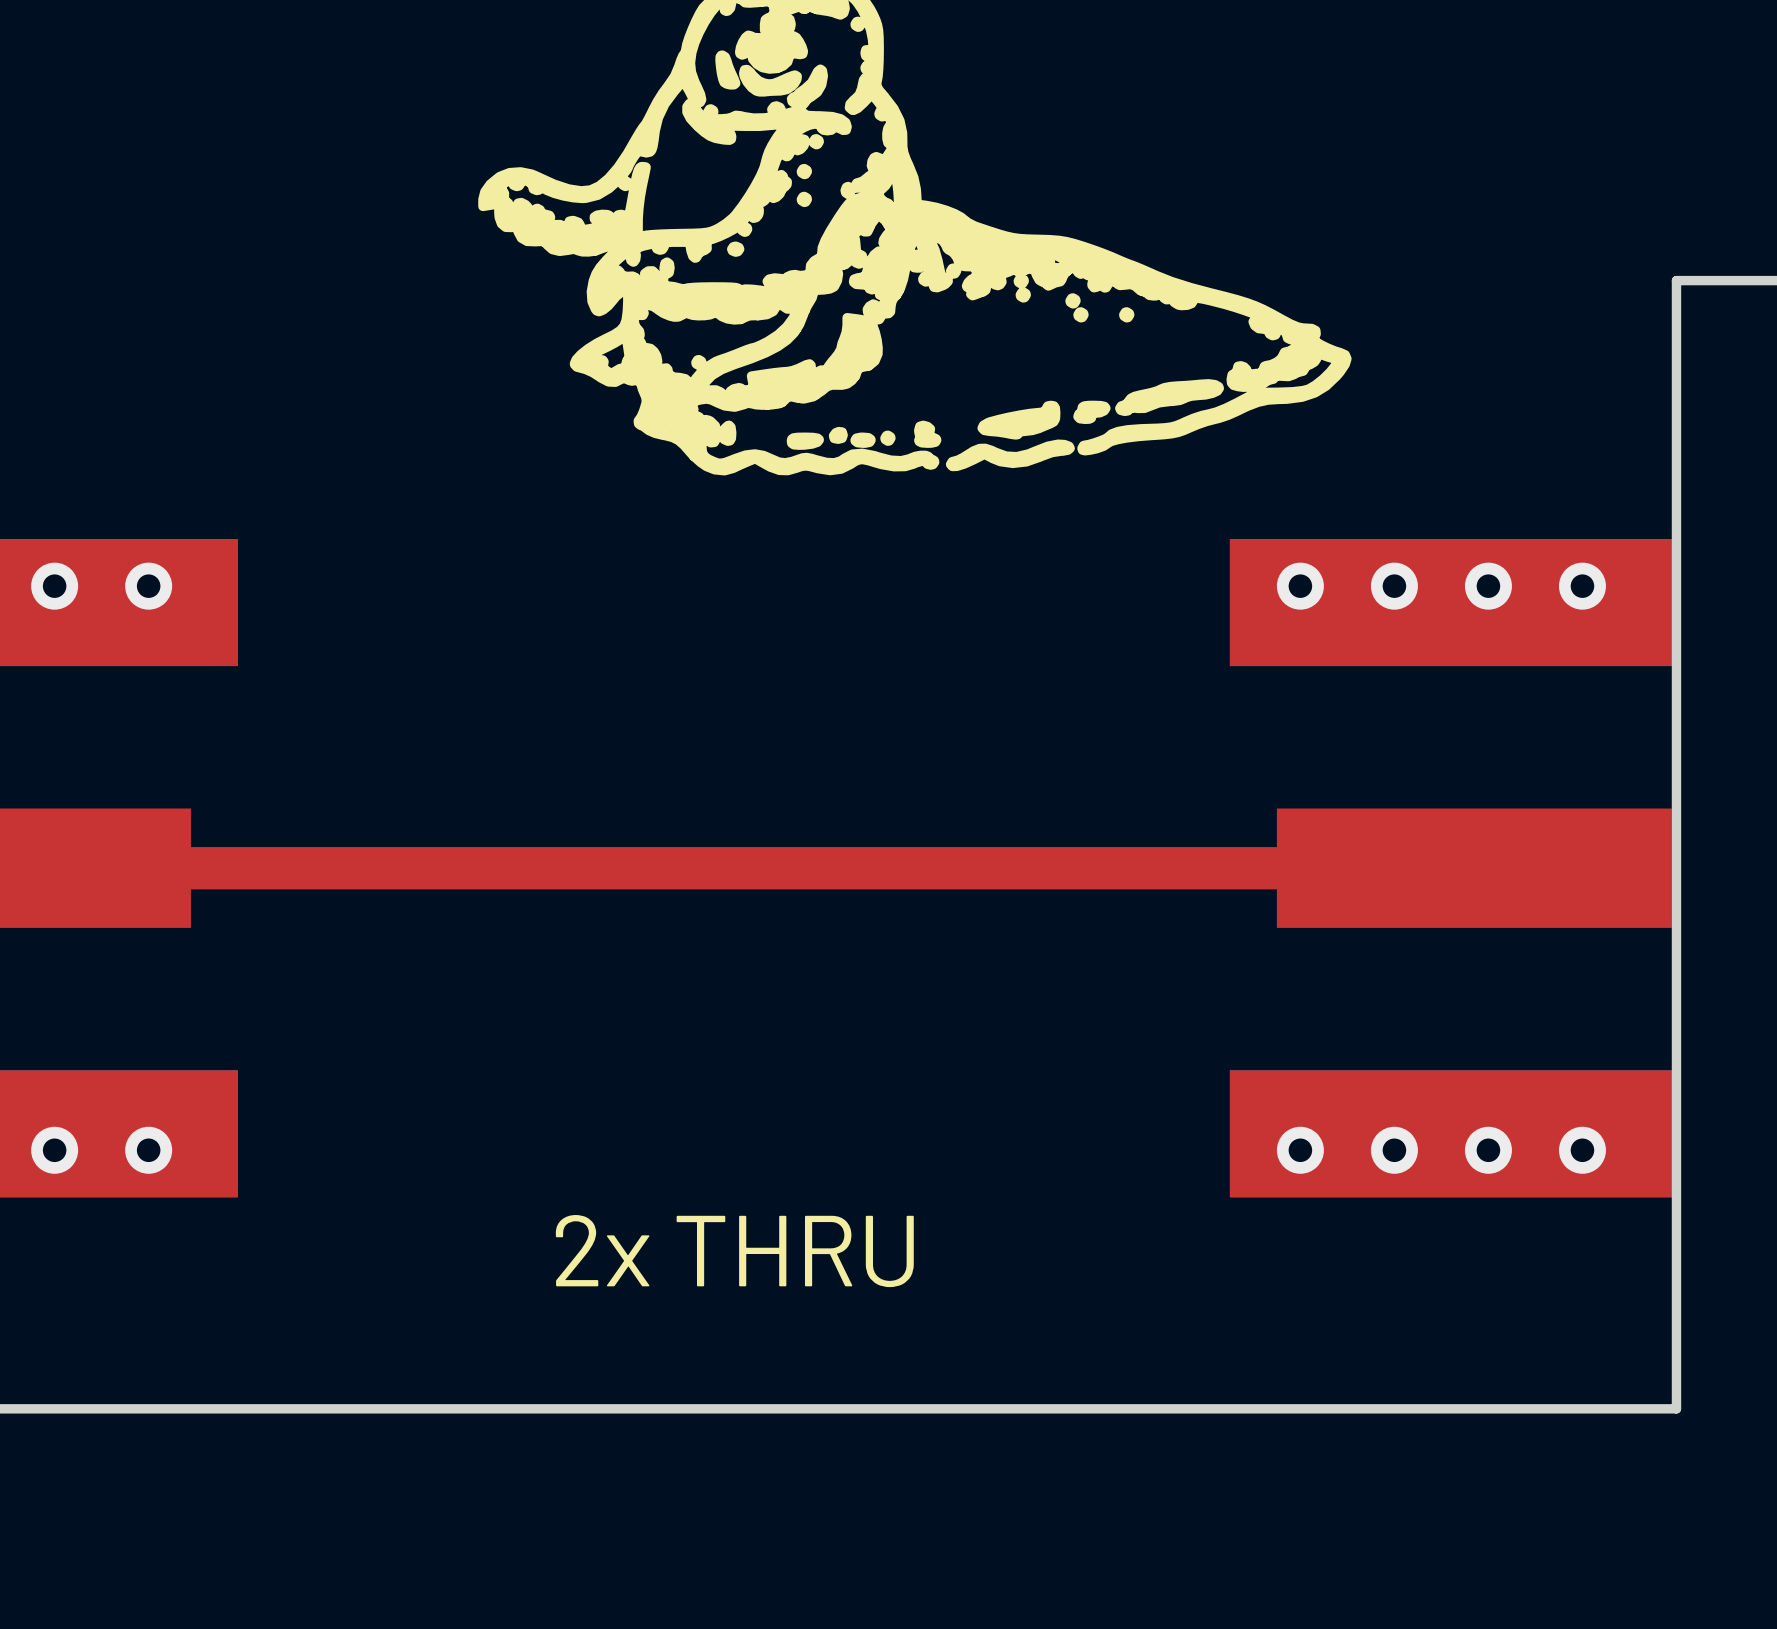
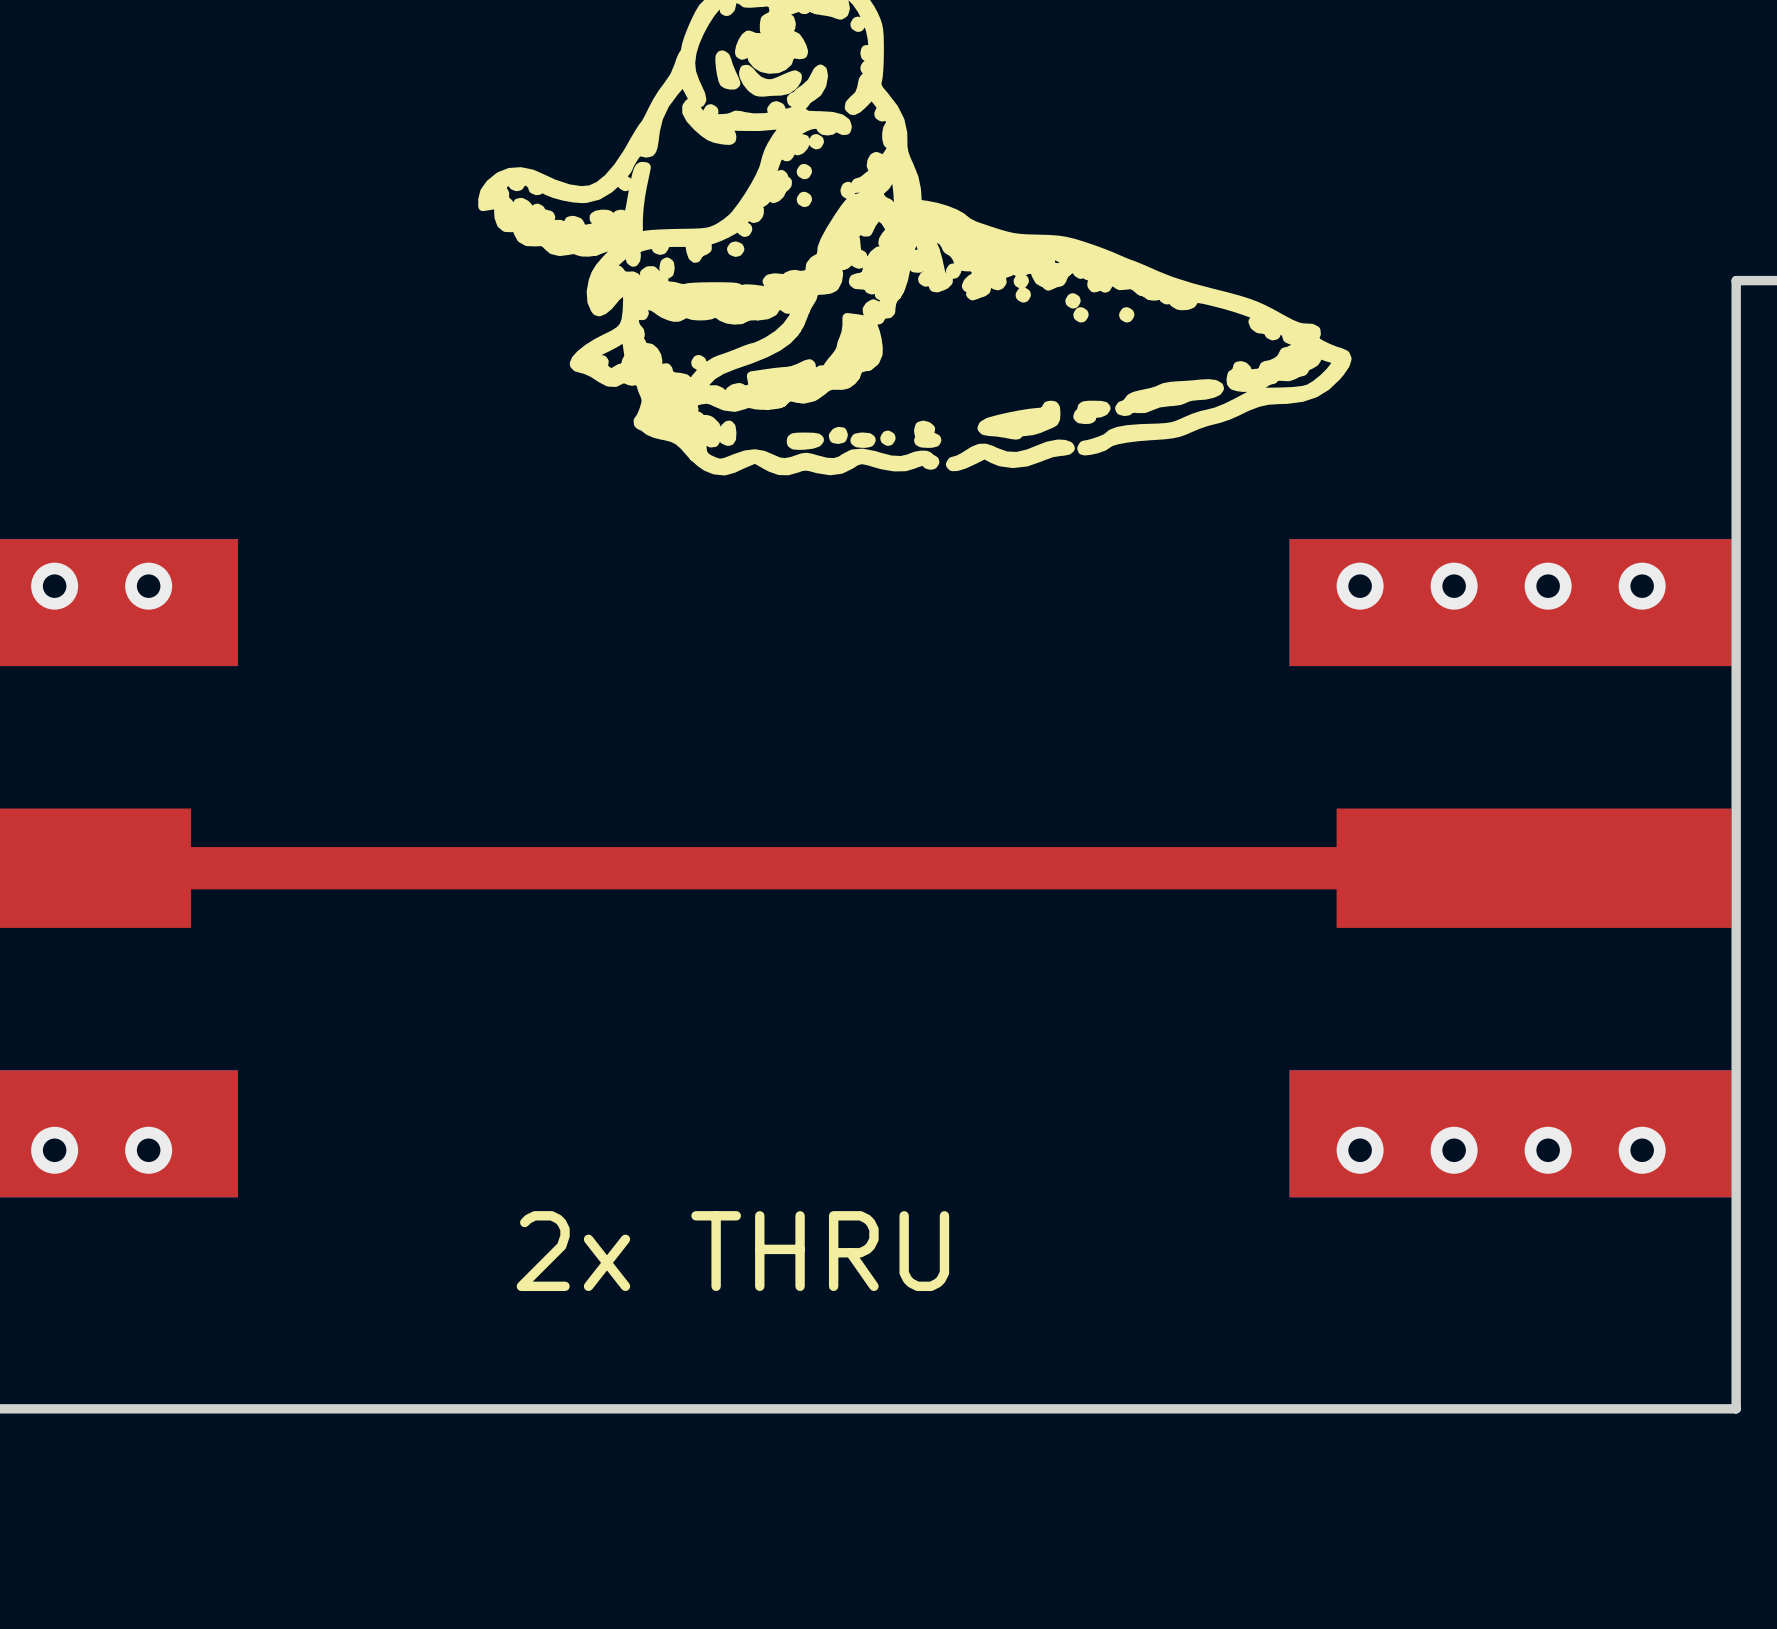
board edge: (1736, 280) (1676, 280) (1676, 1408) -> (1736, 280) (1736, 1408) (1676, 1408)
via: (1300, 586) -> none
via position: (1394, 586) -> (1360, 586)
via position: (1488, 586) -> (1454, 586)
via position: (1582, 586) -> (1548, 586)
via: none -> (1642, 586)
part position: (1450, 868) -> (1510, 868)
via: (1300, 1150) -> none
via position: (1394, 1150) -> (1360, 1150)
via position: (1488, 1150) -> (1454, 1150)
via position: (1582, 1150) -> (1548, 1150)
via: none -> (1642, 1150)

